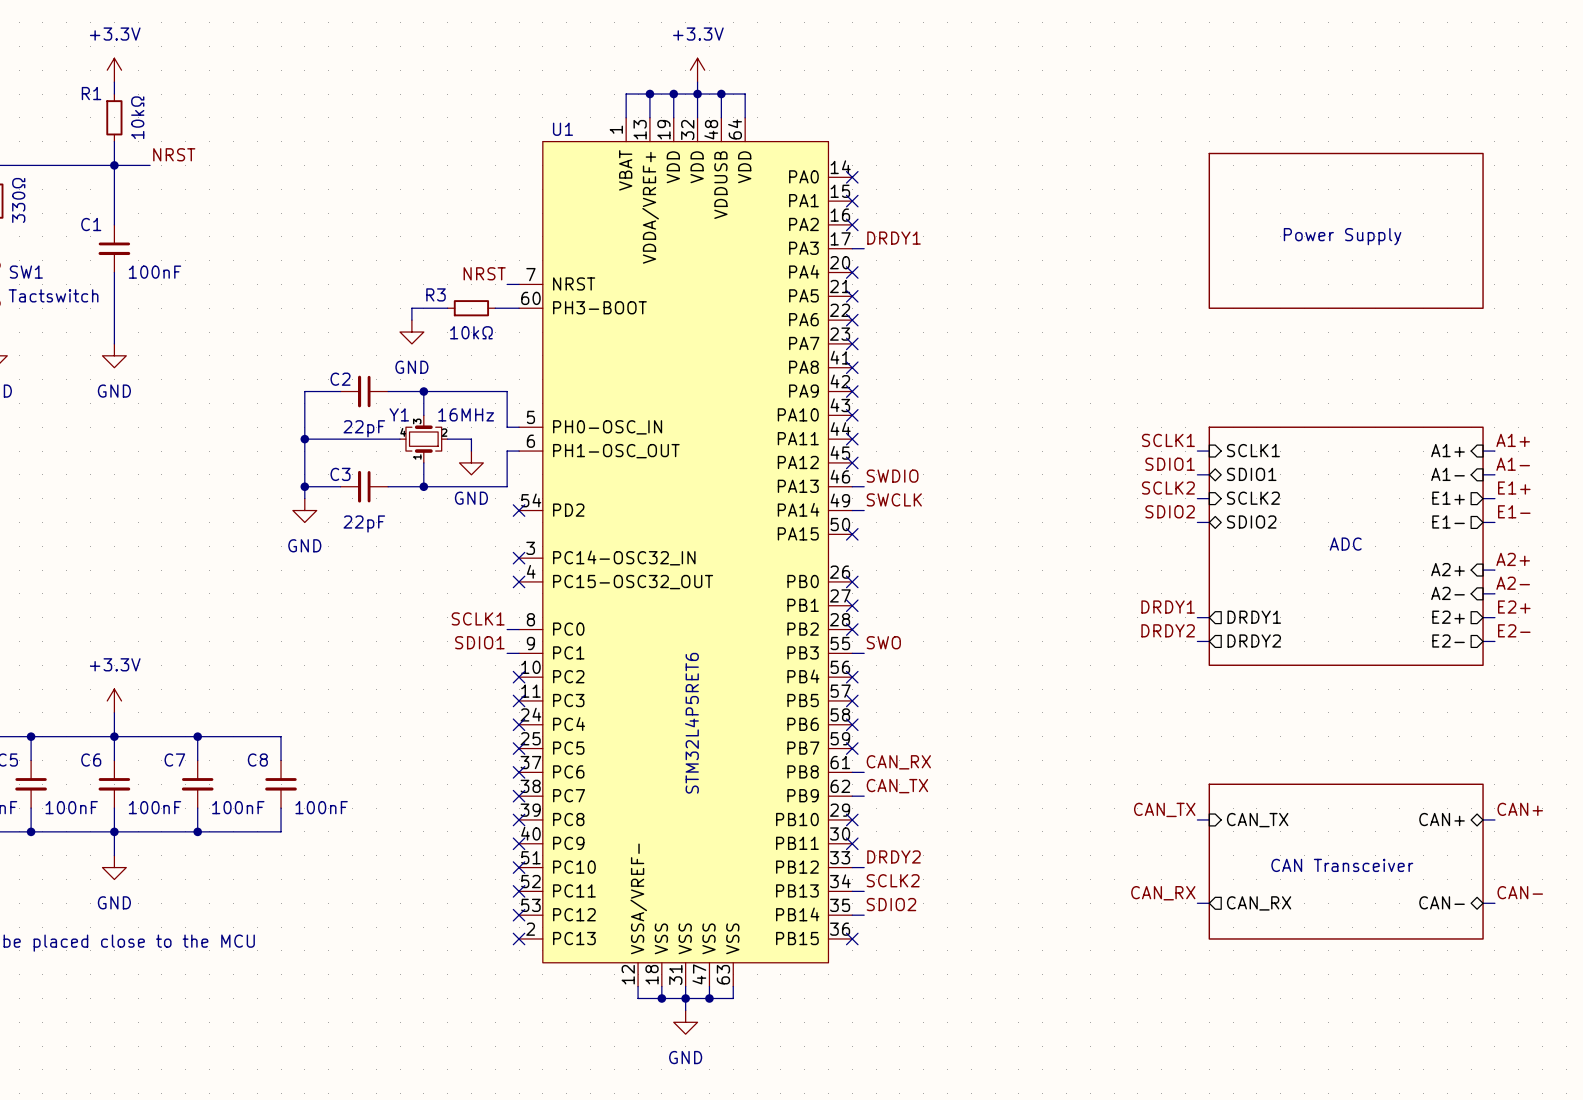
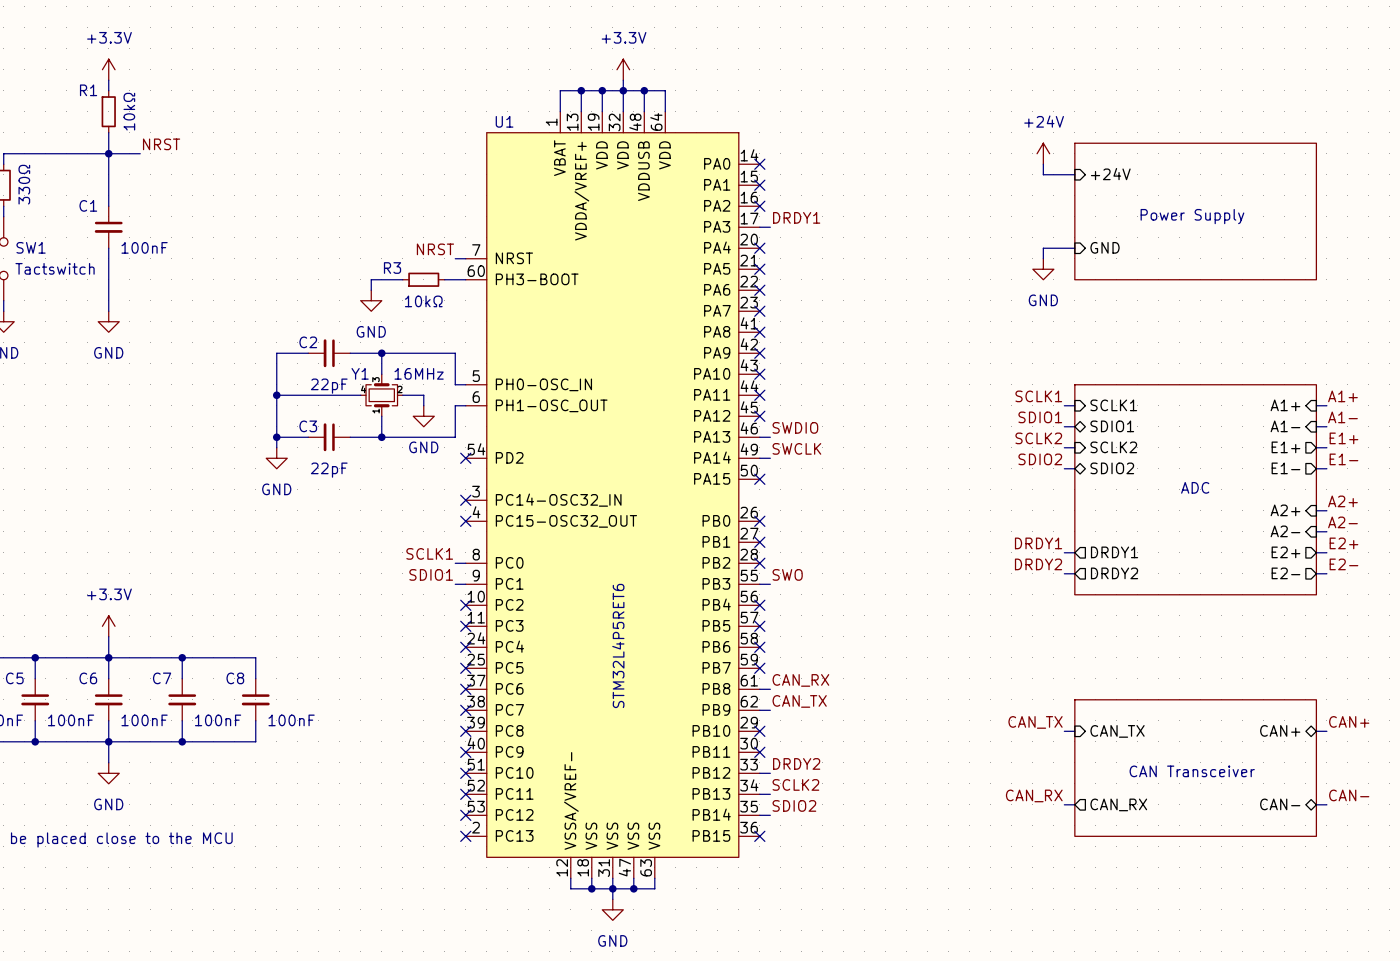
power symbol: none -> +24V (1043, 153)
wire: none -> (1043, 164) (1043, 174) (1074, 174)
sheet pin: none -> +24V (1110, 174)
wire: none -> (1074, 248) (1043, 248) (1043, 258)
sheet pin: none -> GND (1105, 247)
power symbol: none -> GND (1043, 269)

